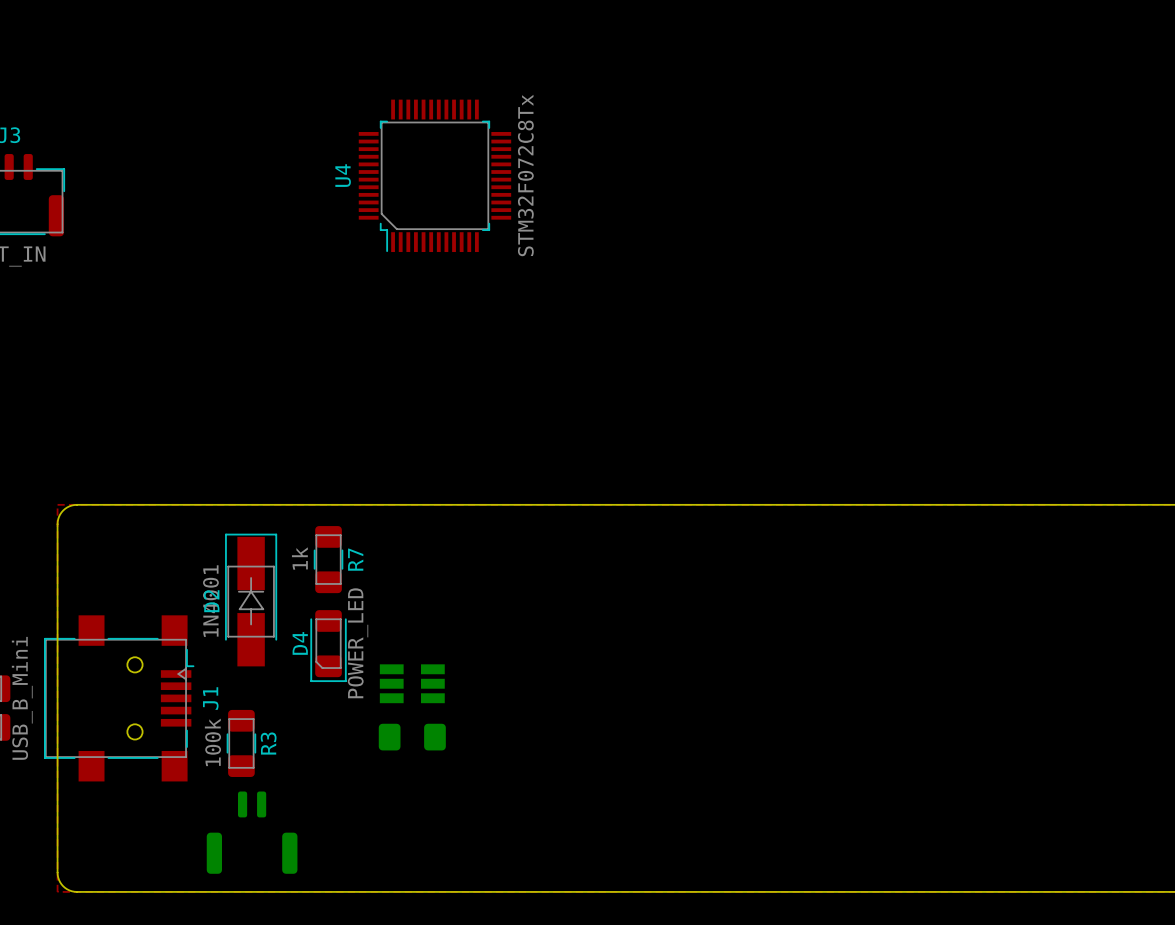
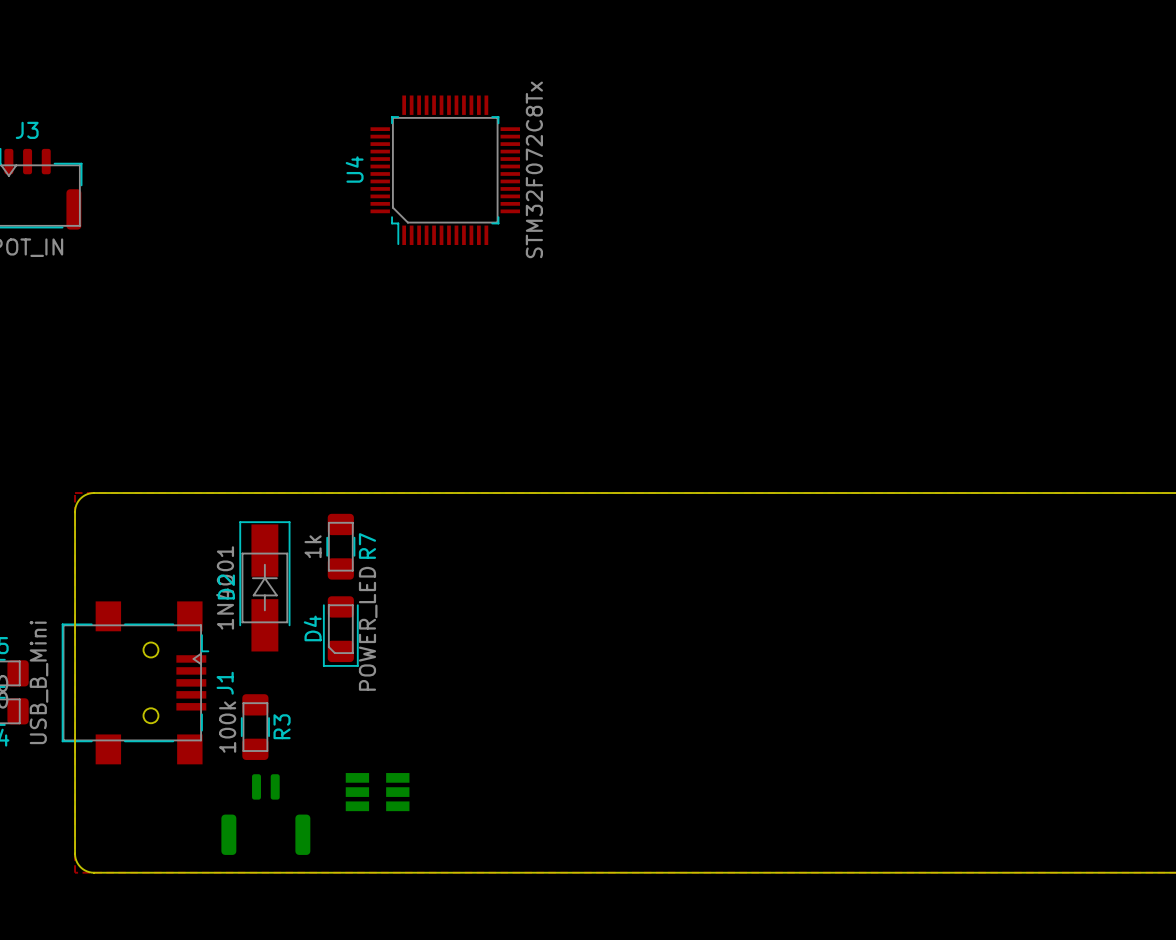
part position: (412, 683) -> (377, 792)
part: (412, 737) -> none

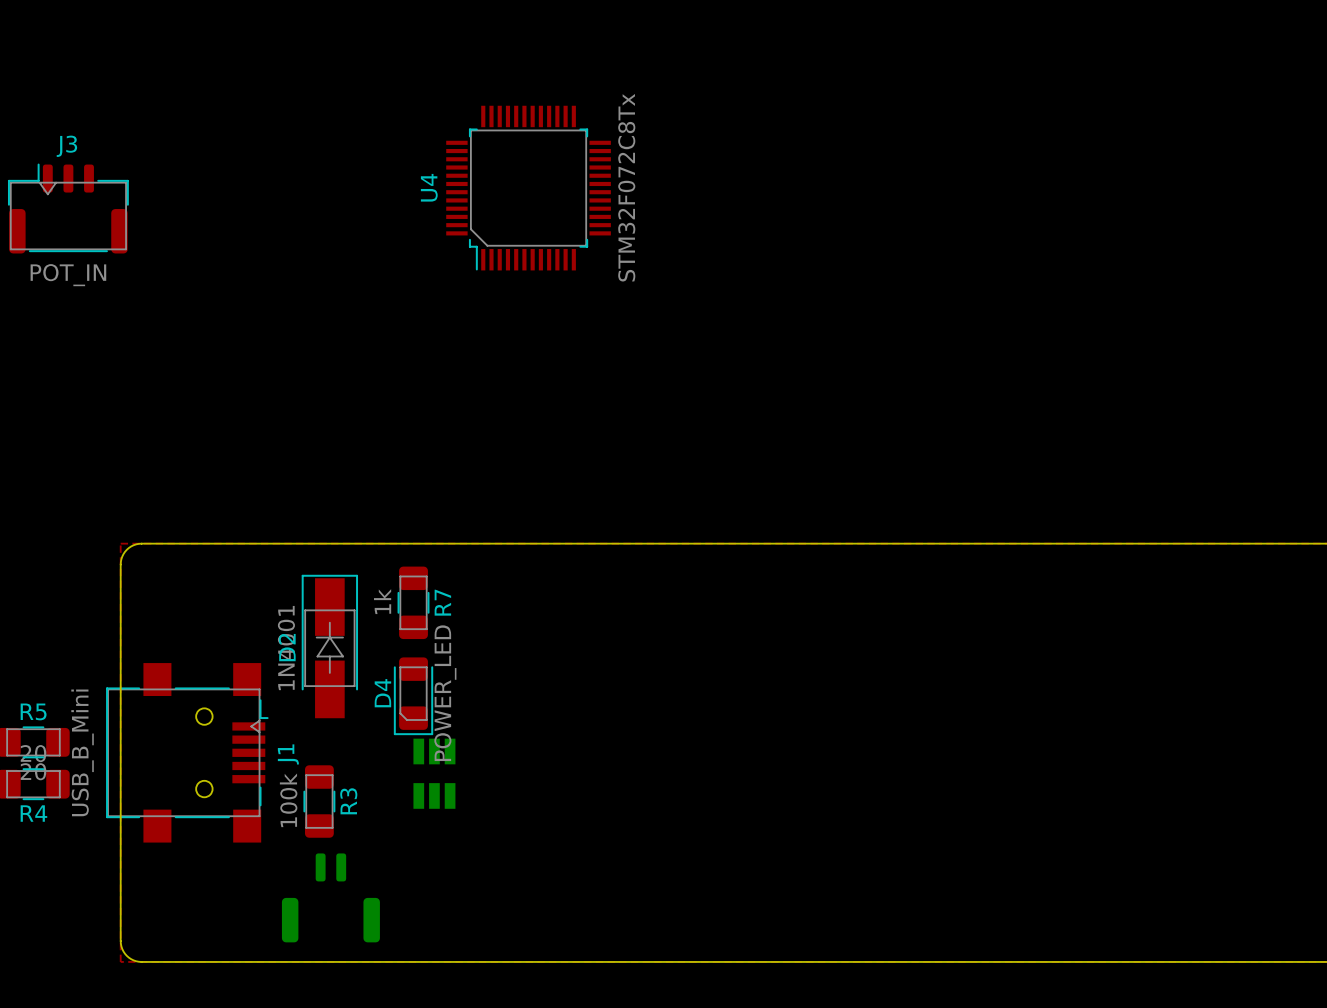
part rotation: 0° (377, 792) -> 90° clockwise (434, 773)
part position: (377, 792) -> (434, 773)

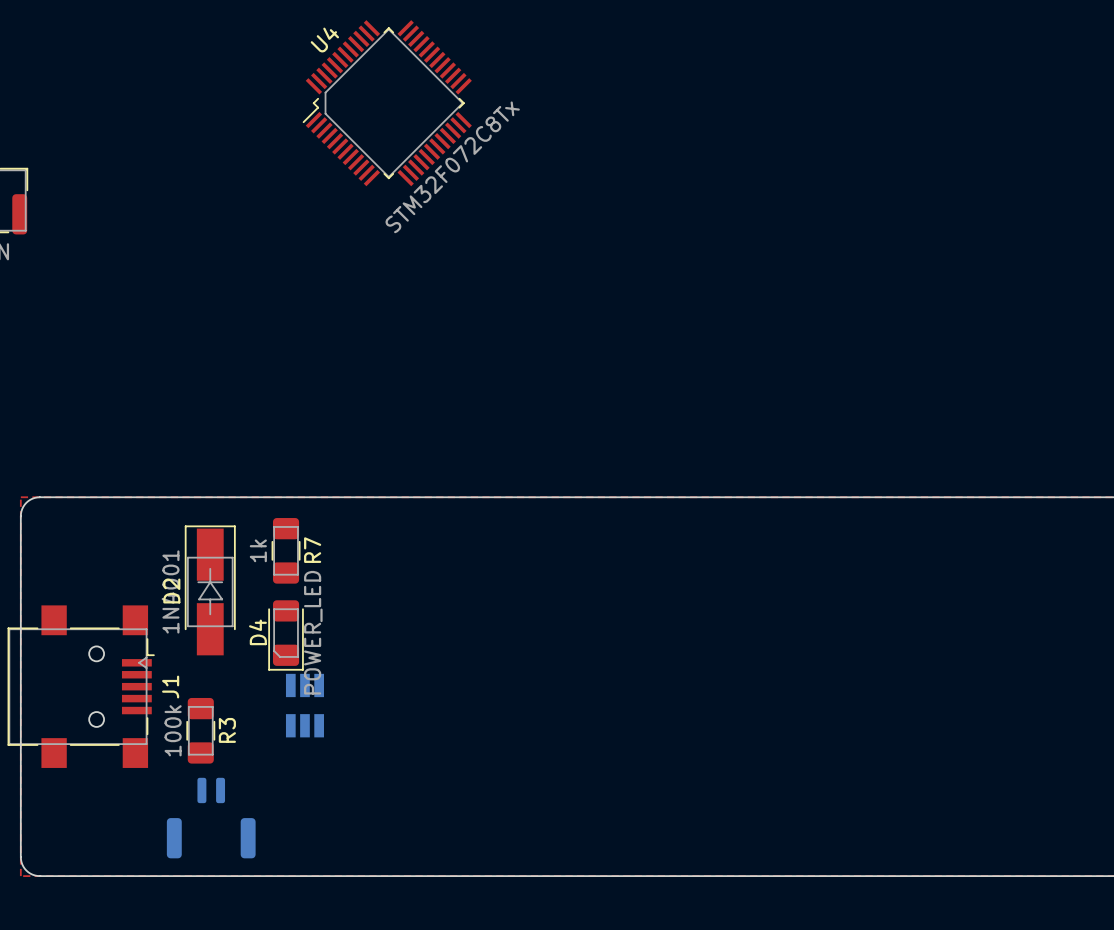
U4 rotation: 0° (528, 188) -> 45° clockwise (387, 103)

